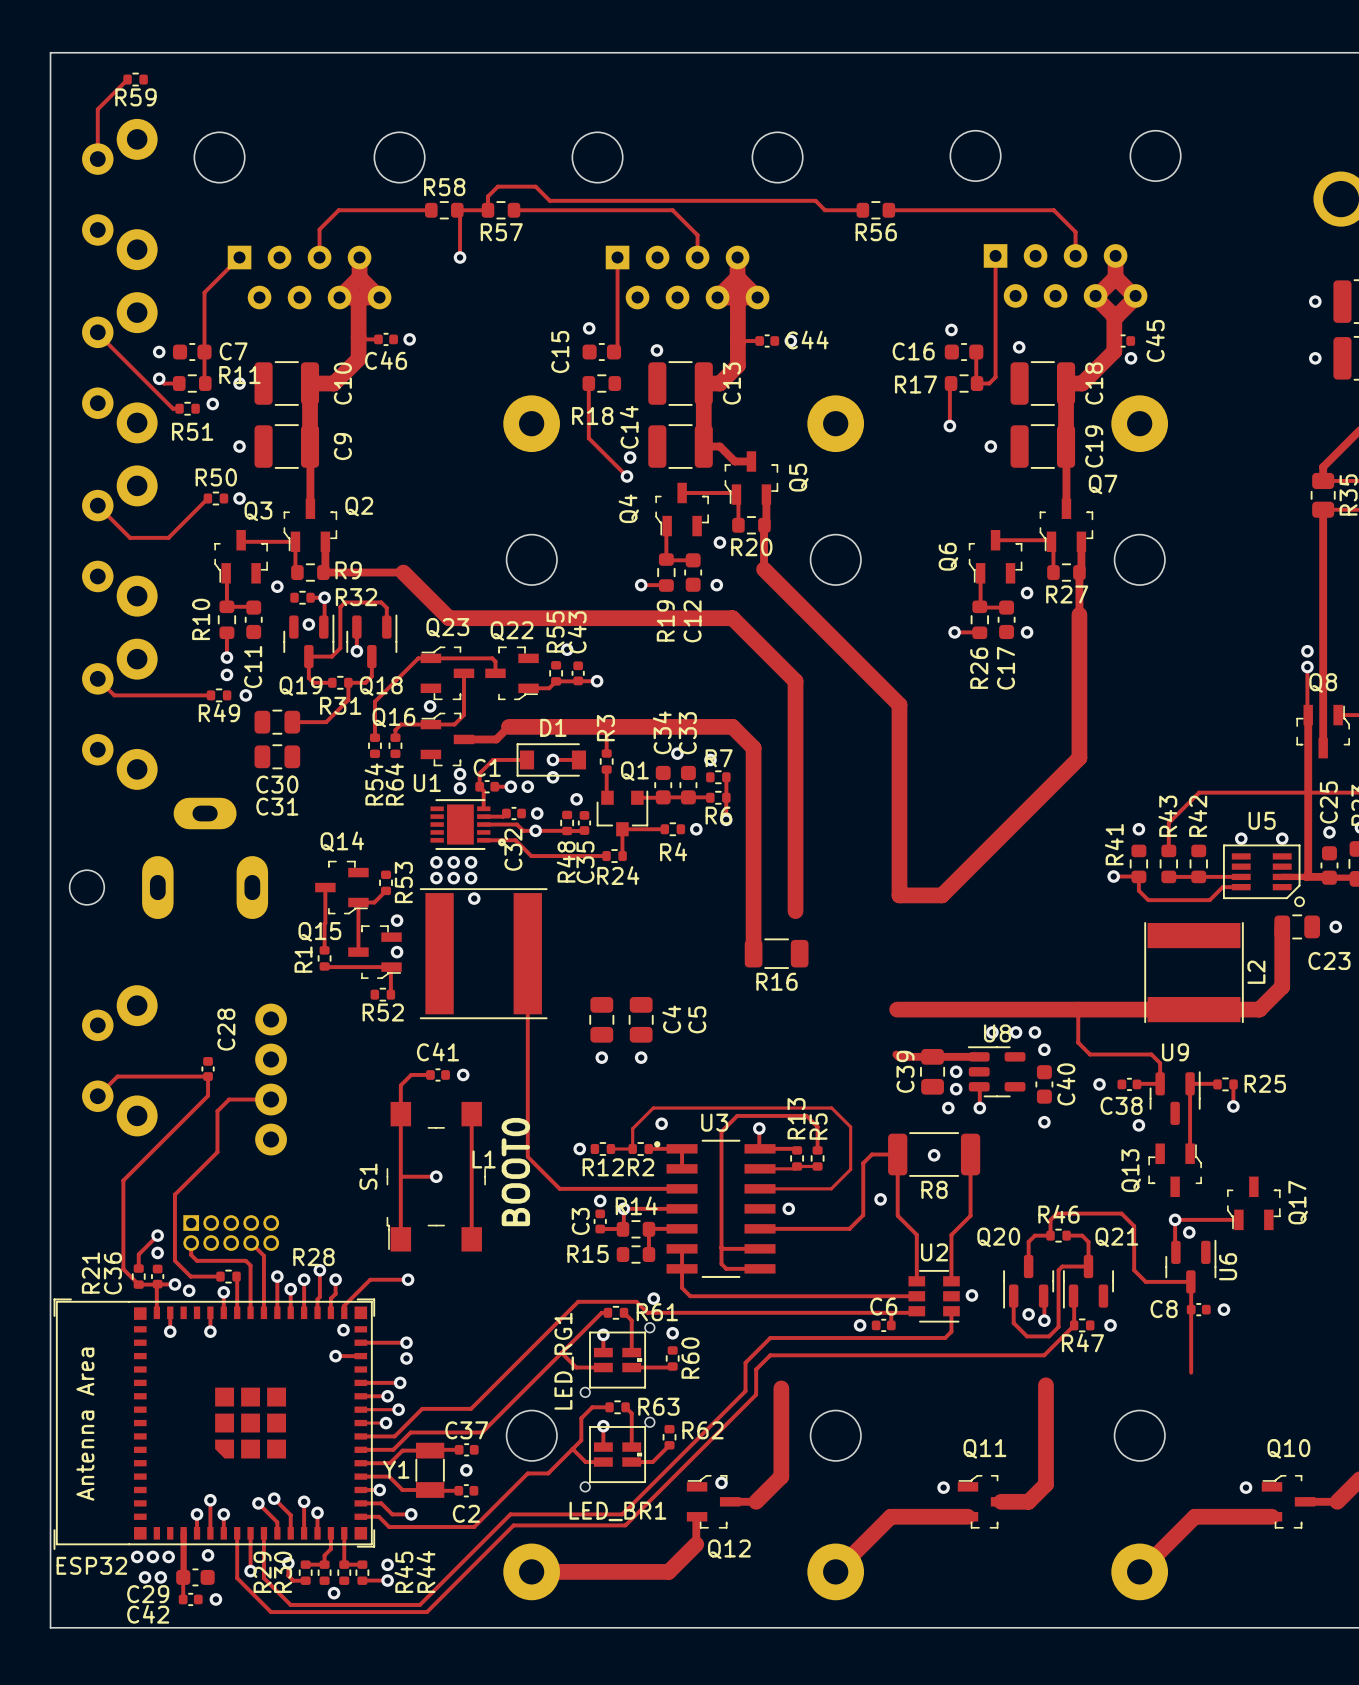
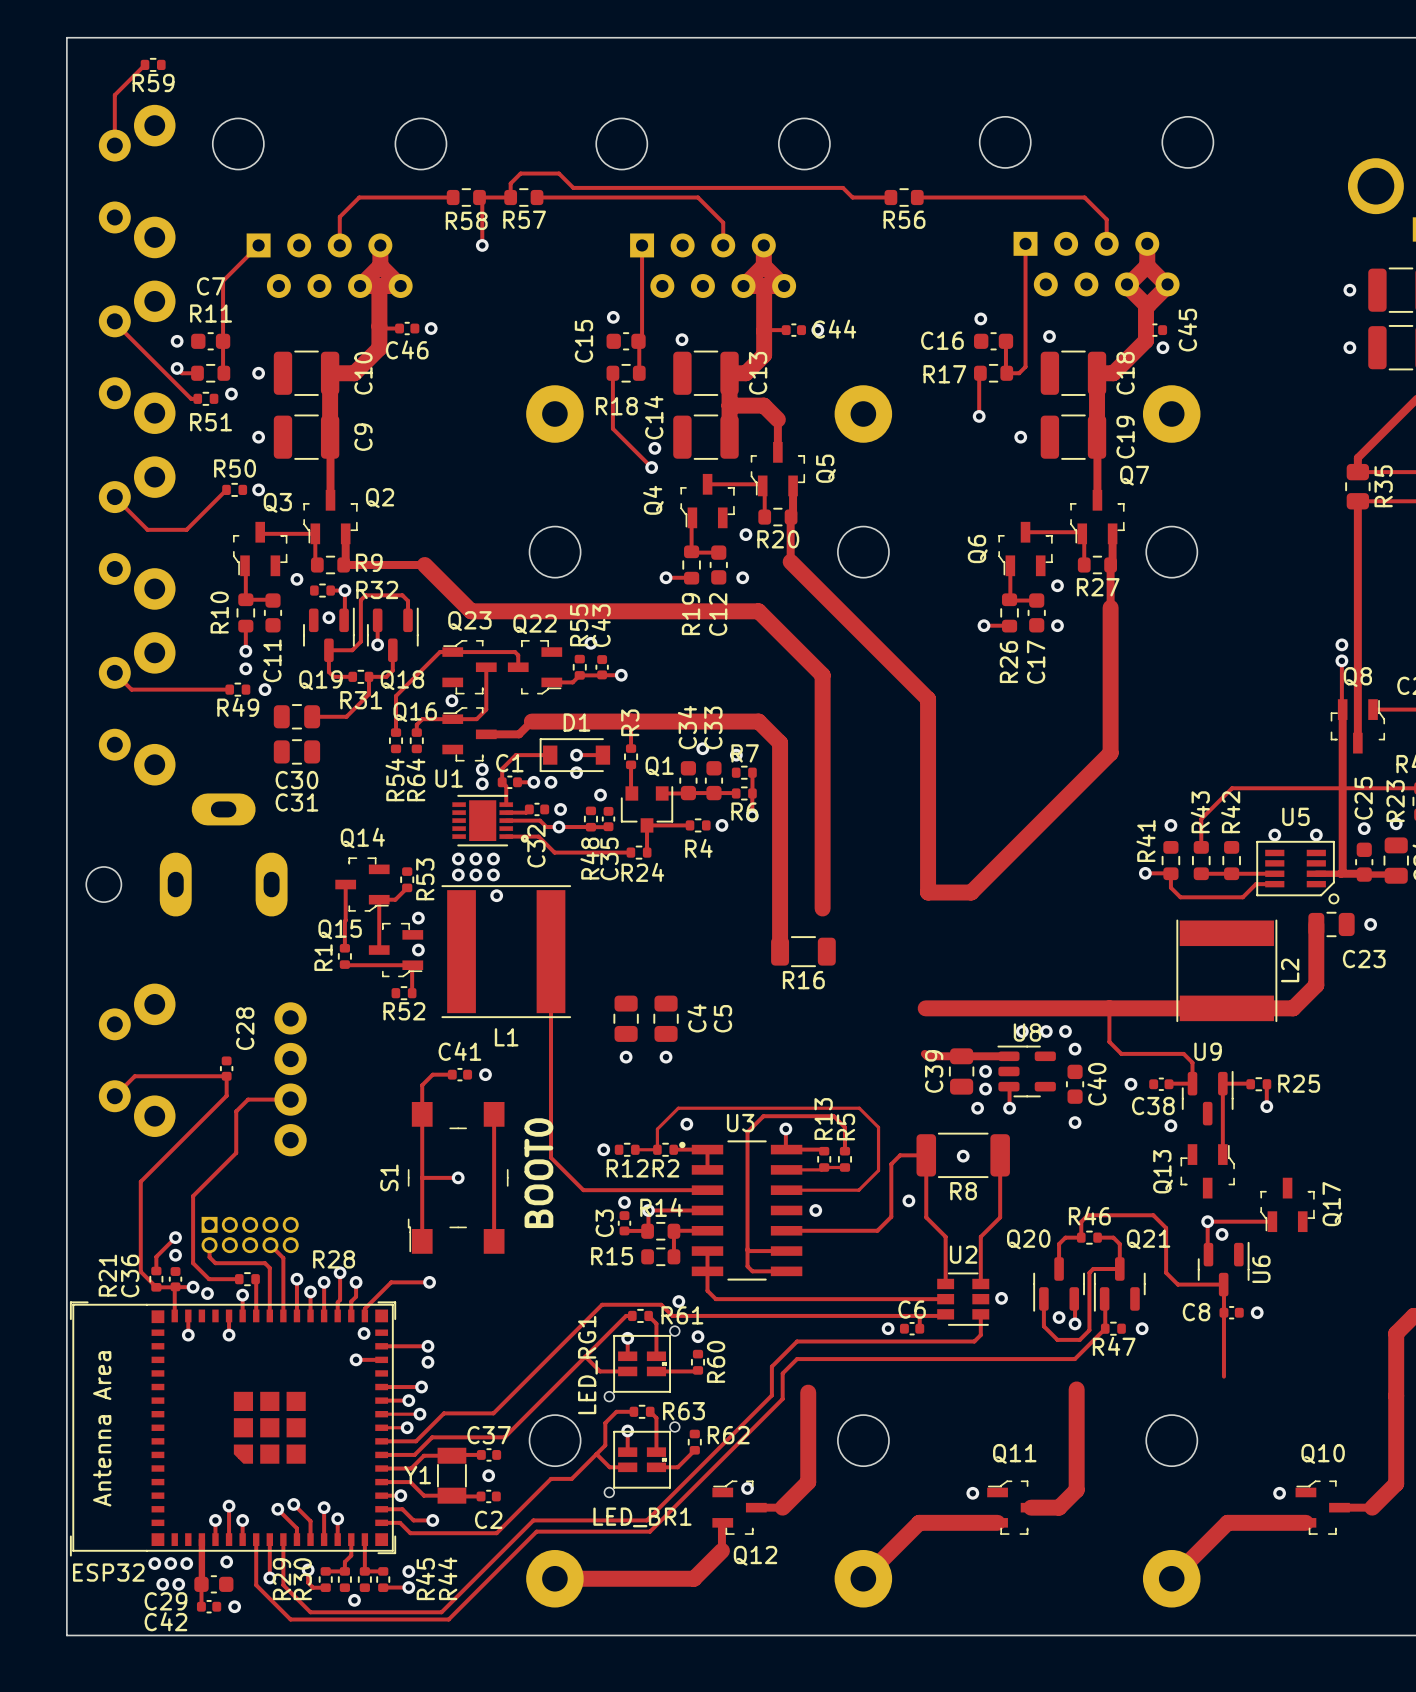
R58 name position: R58 (444, 187) -> R58 (466, 220)
C7 name position: C7 (233, 351) -> C7 (211, 286)
track: none -> (638, 341) (639, 373)
R11 name position: R11 (239, 375) -> R11 (211, 313)
track: (704, 446) (719, 446) (734, 461) (751, 461) -> (729, 405) (763, 405) (777, 419) (777, 452)
L1 name position: L1 (484, 1159) -> L1 (506, 1037)

